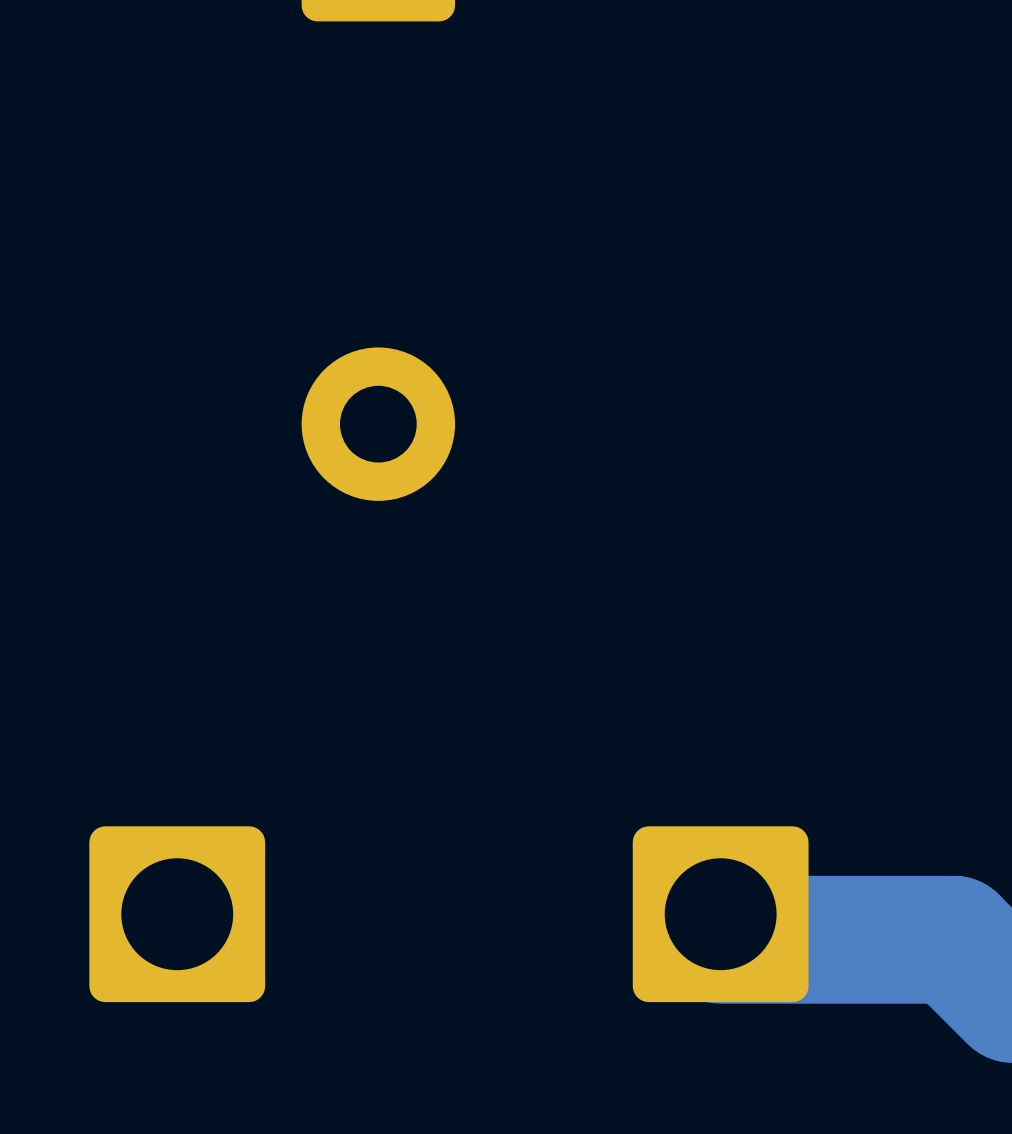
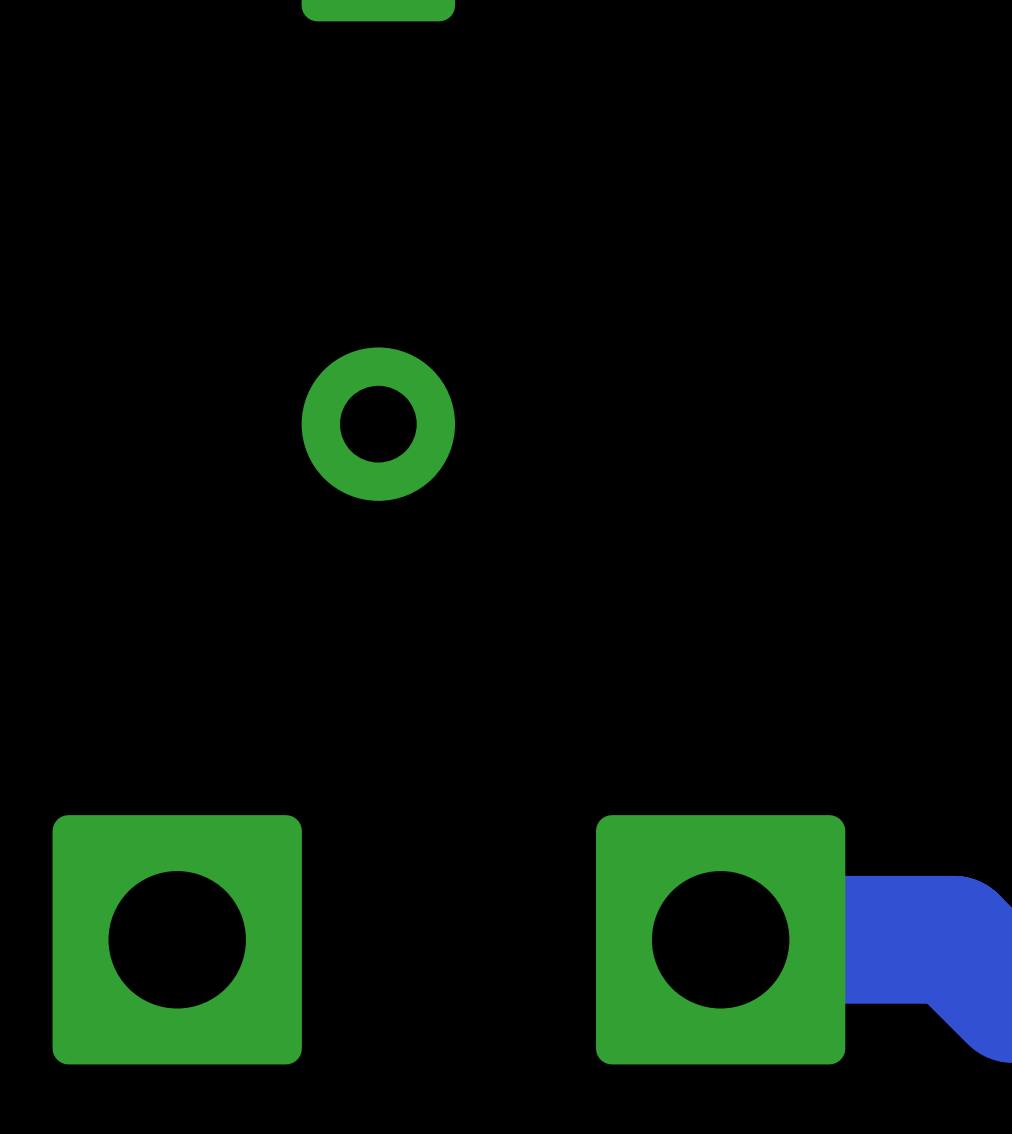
part footprint: [89, 826, 266, 1003] -> [52, 815, 302, 1065]
part footprint: [632, 826, 809, 1003] -> [595, 815, 846, 1065]

